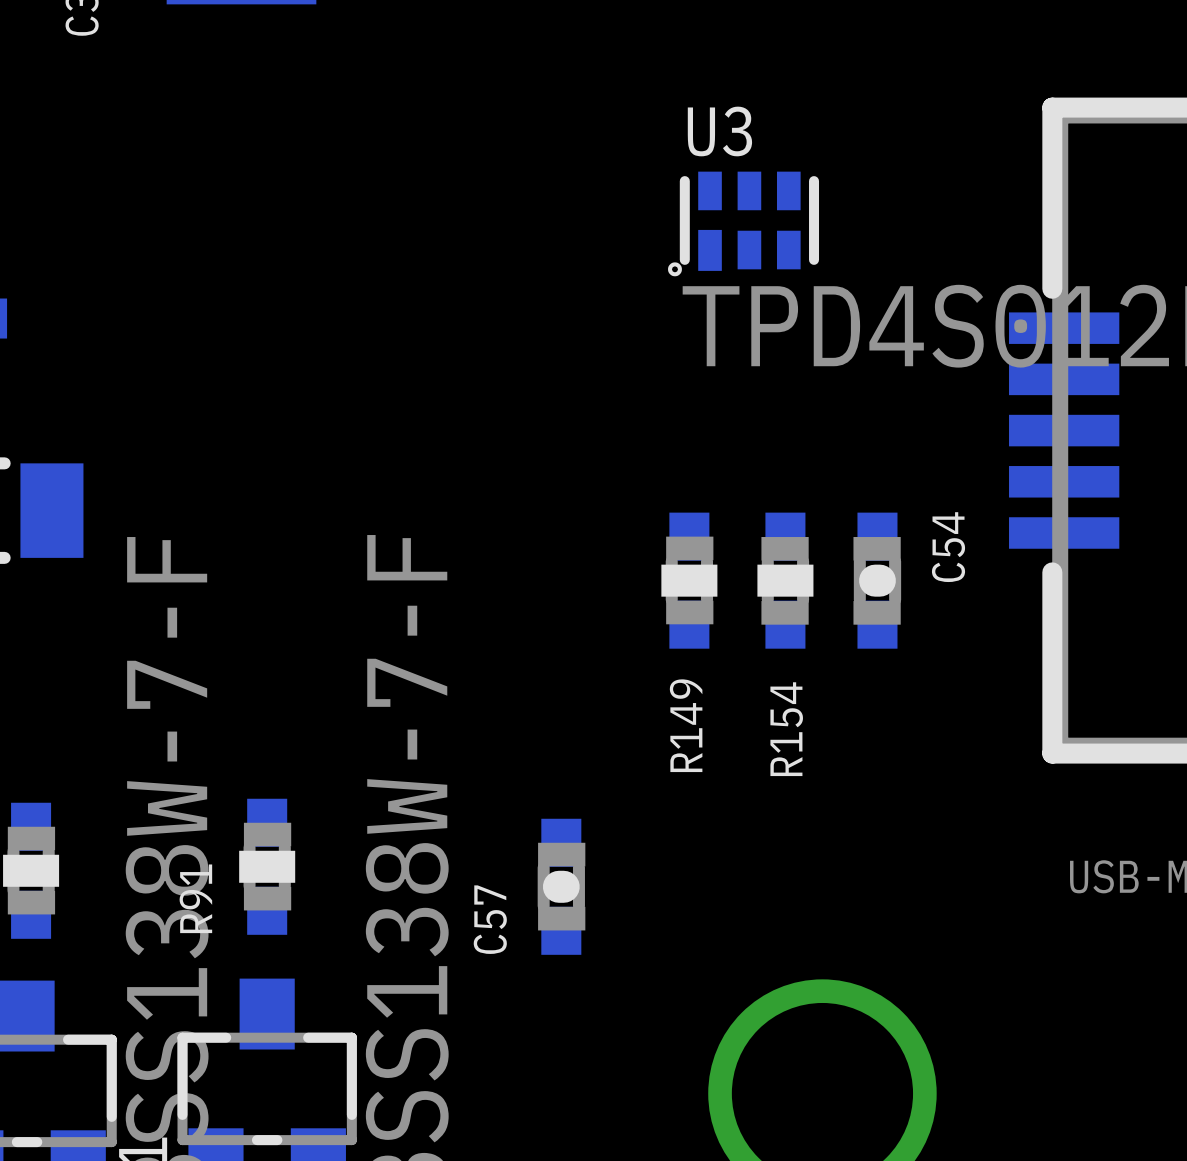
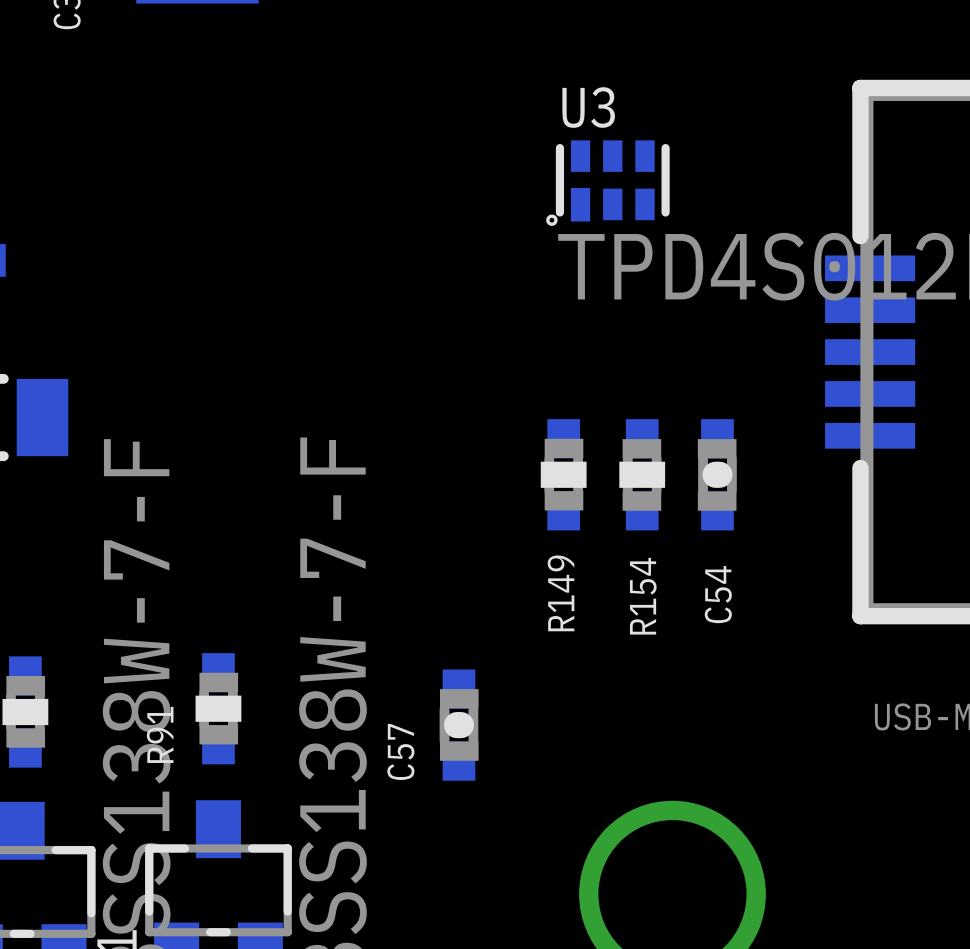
C54 name position: C54 (948, 547) -> C54 (718, 594)

